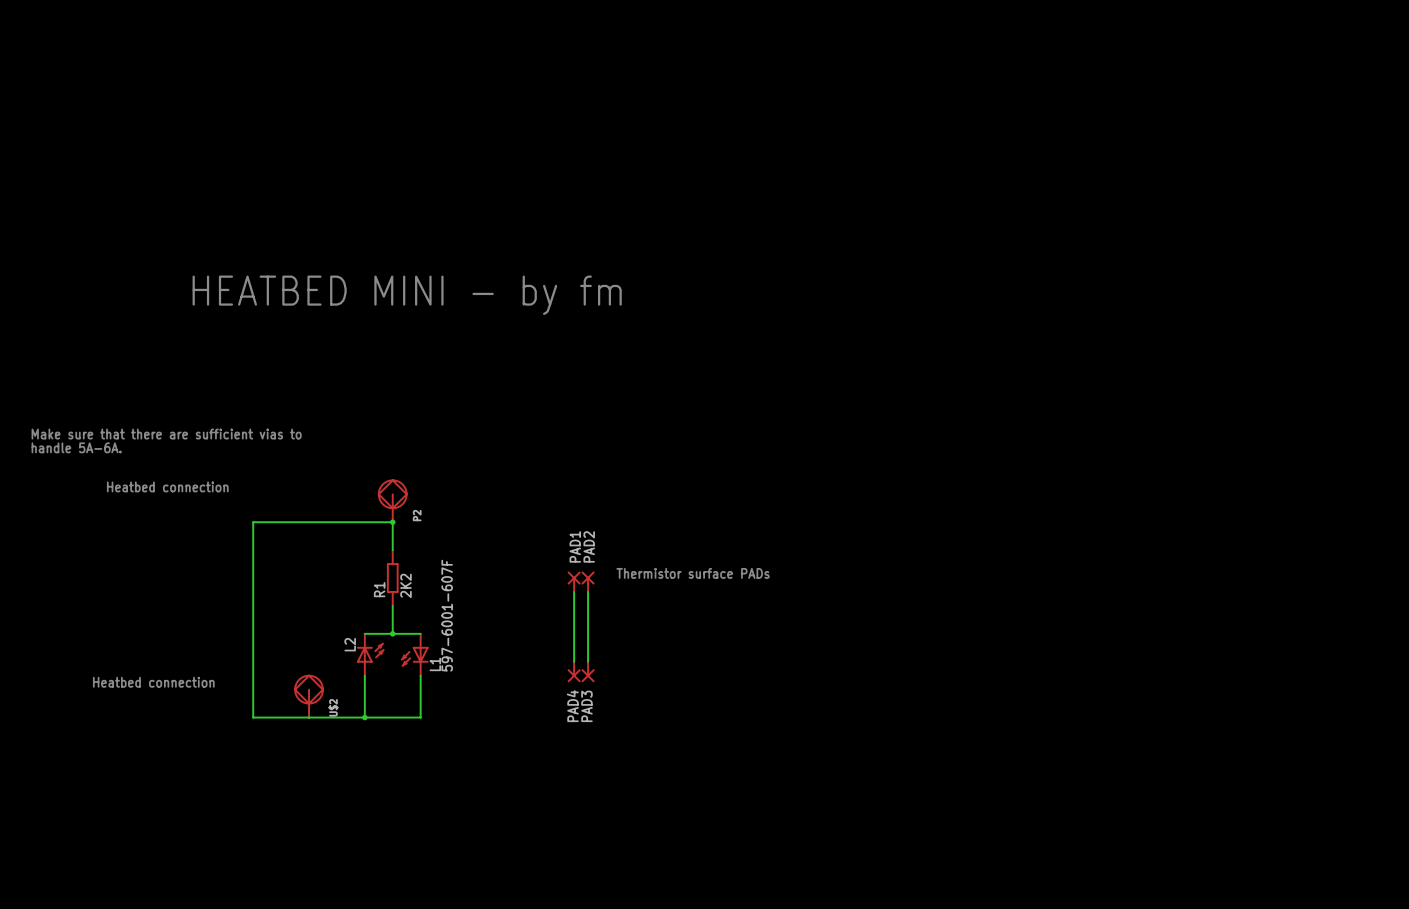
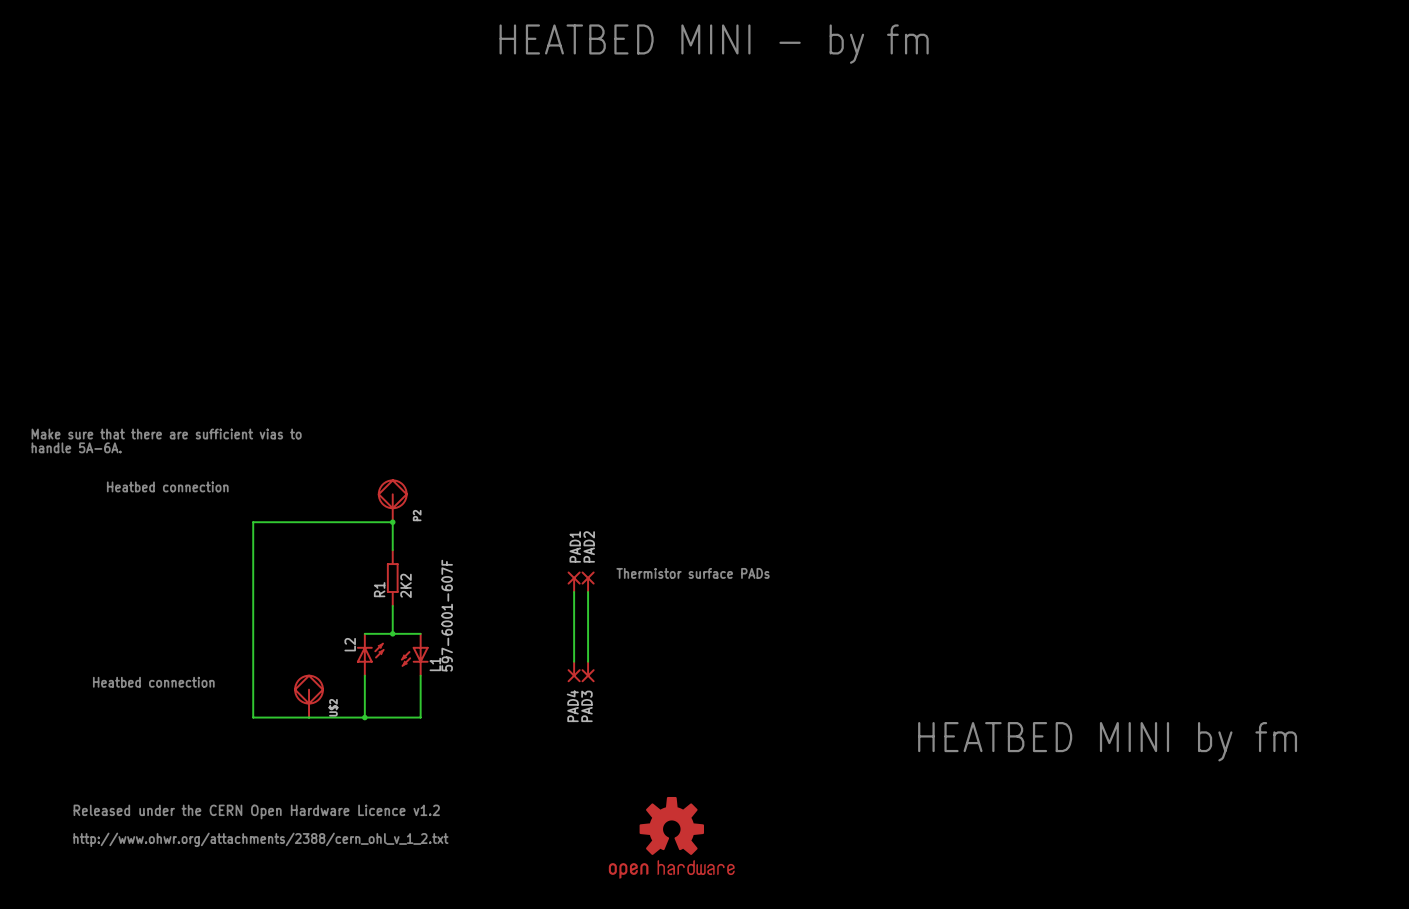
text: none -> HEATBED MINI - by fm (714, 44)
text: HEATBED MINI - by fm (407, 295) -> none
text: none -> HEATBED MINI by fm (1107, 741)
text: none -> Released under the CERN Open Hardware Licence v1.2 (256, 811)
part: none -> (671, 837)
text: none -> http://www.ohwr.org/attachments/2388/cern_ohl_v_1_2.txt (260, 839)

